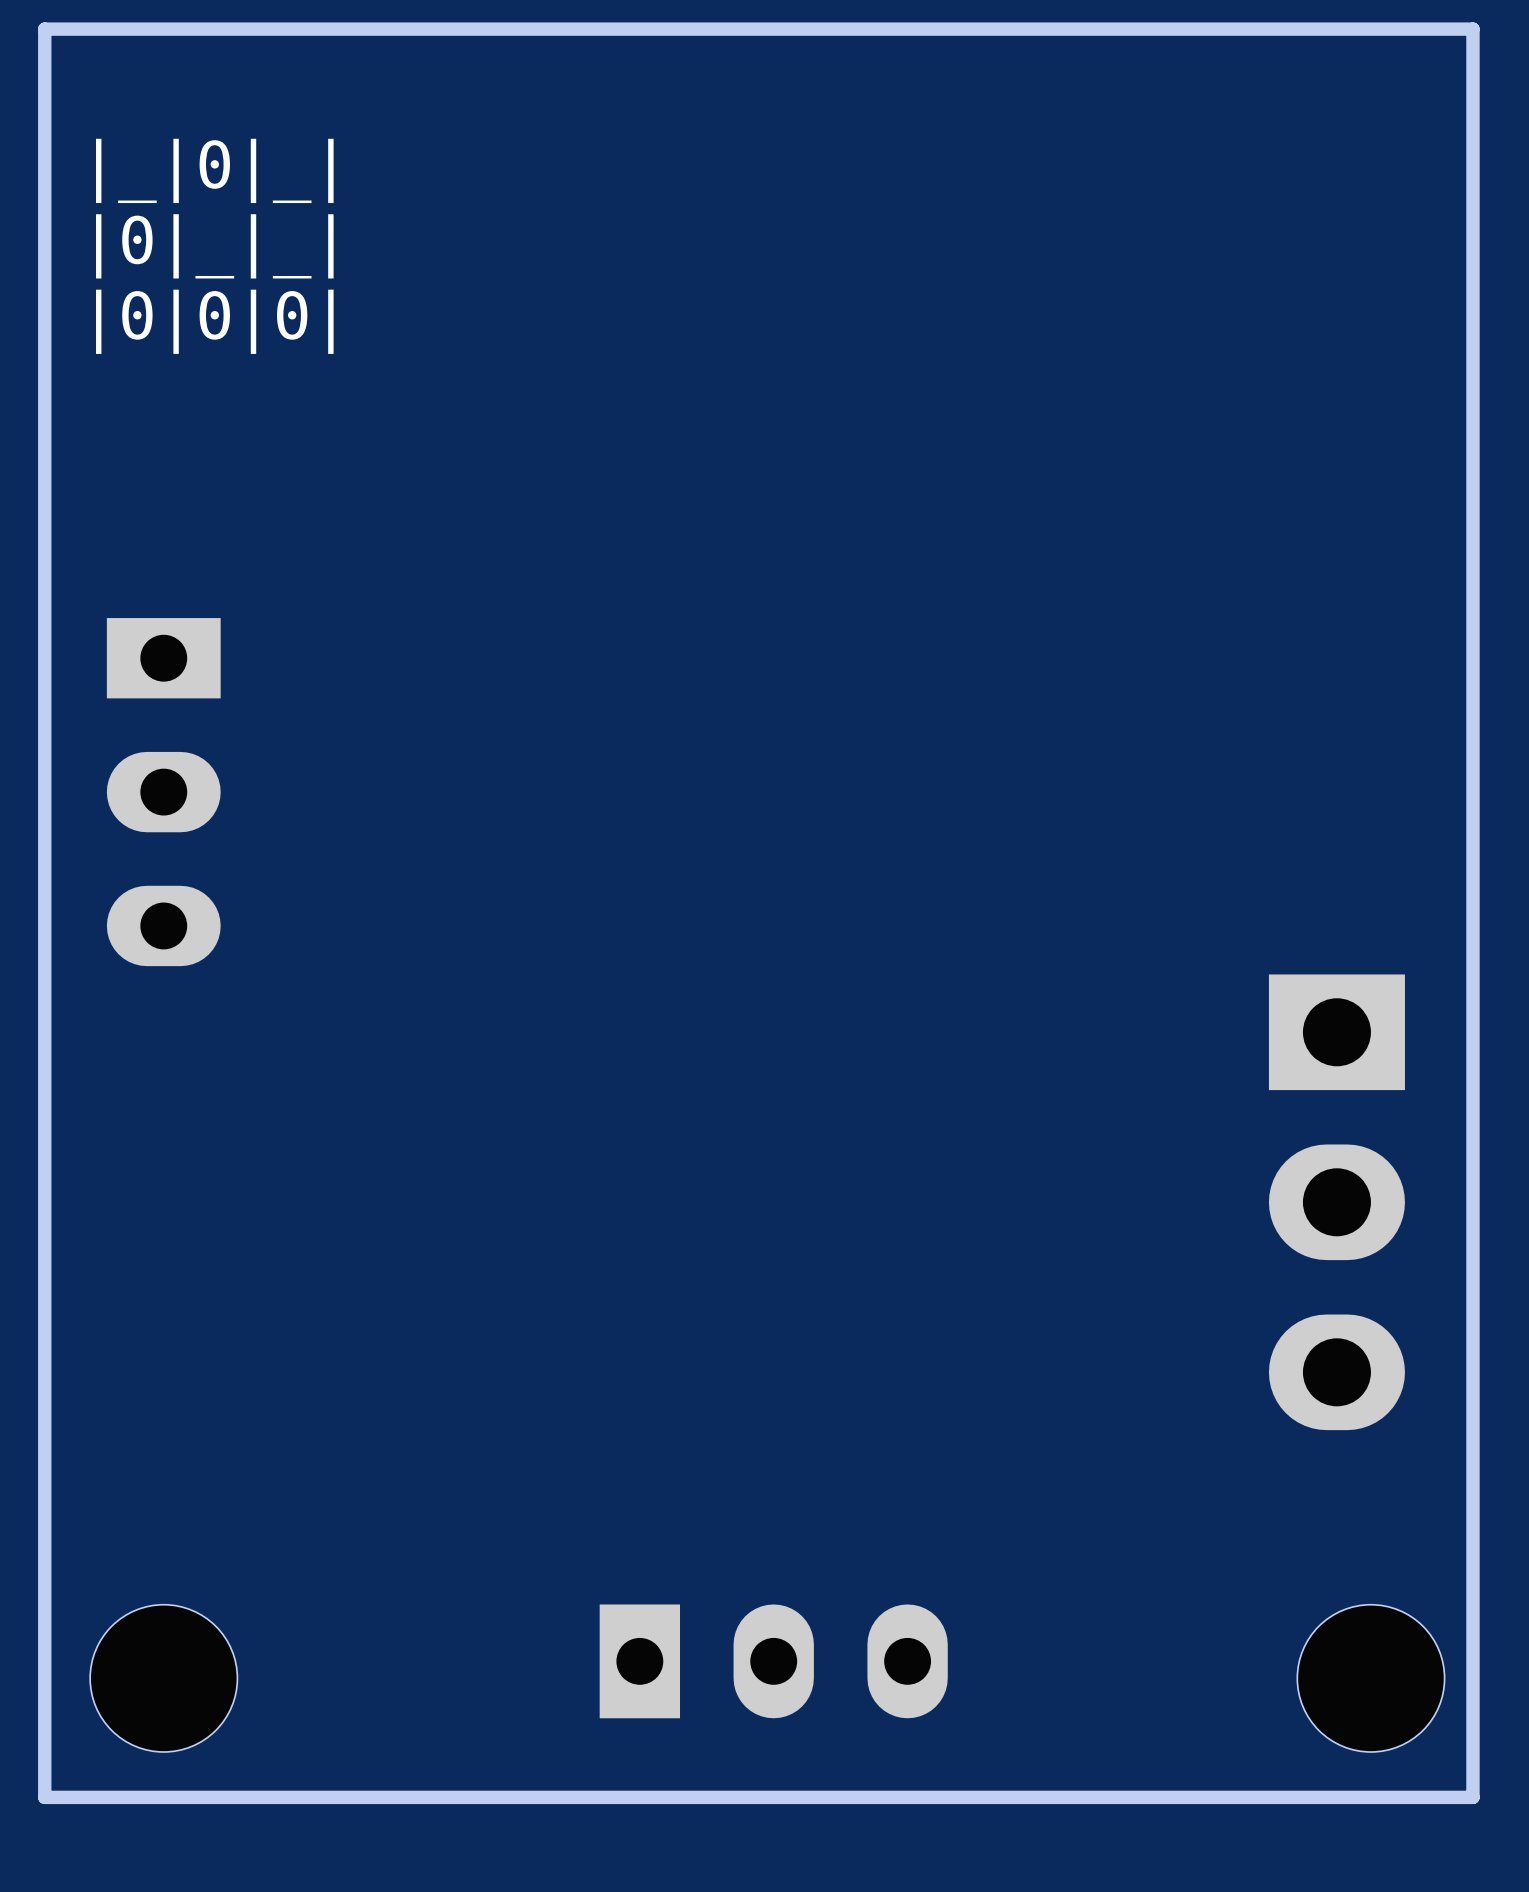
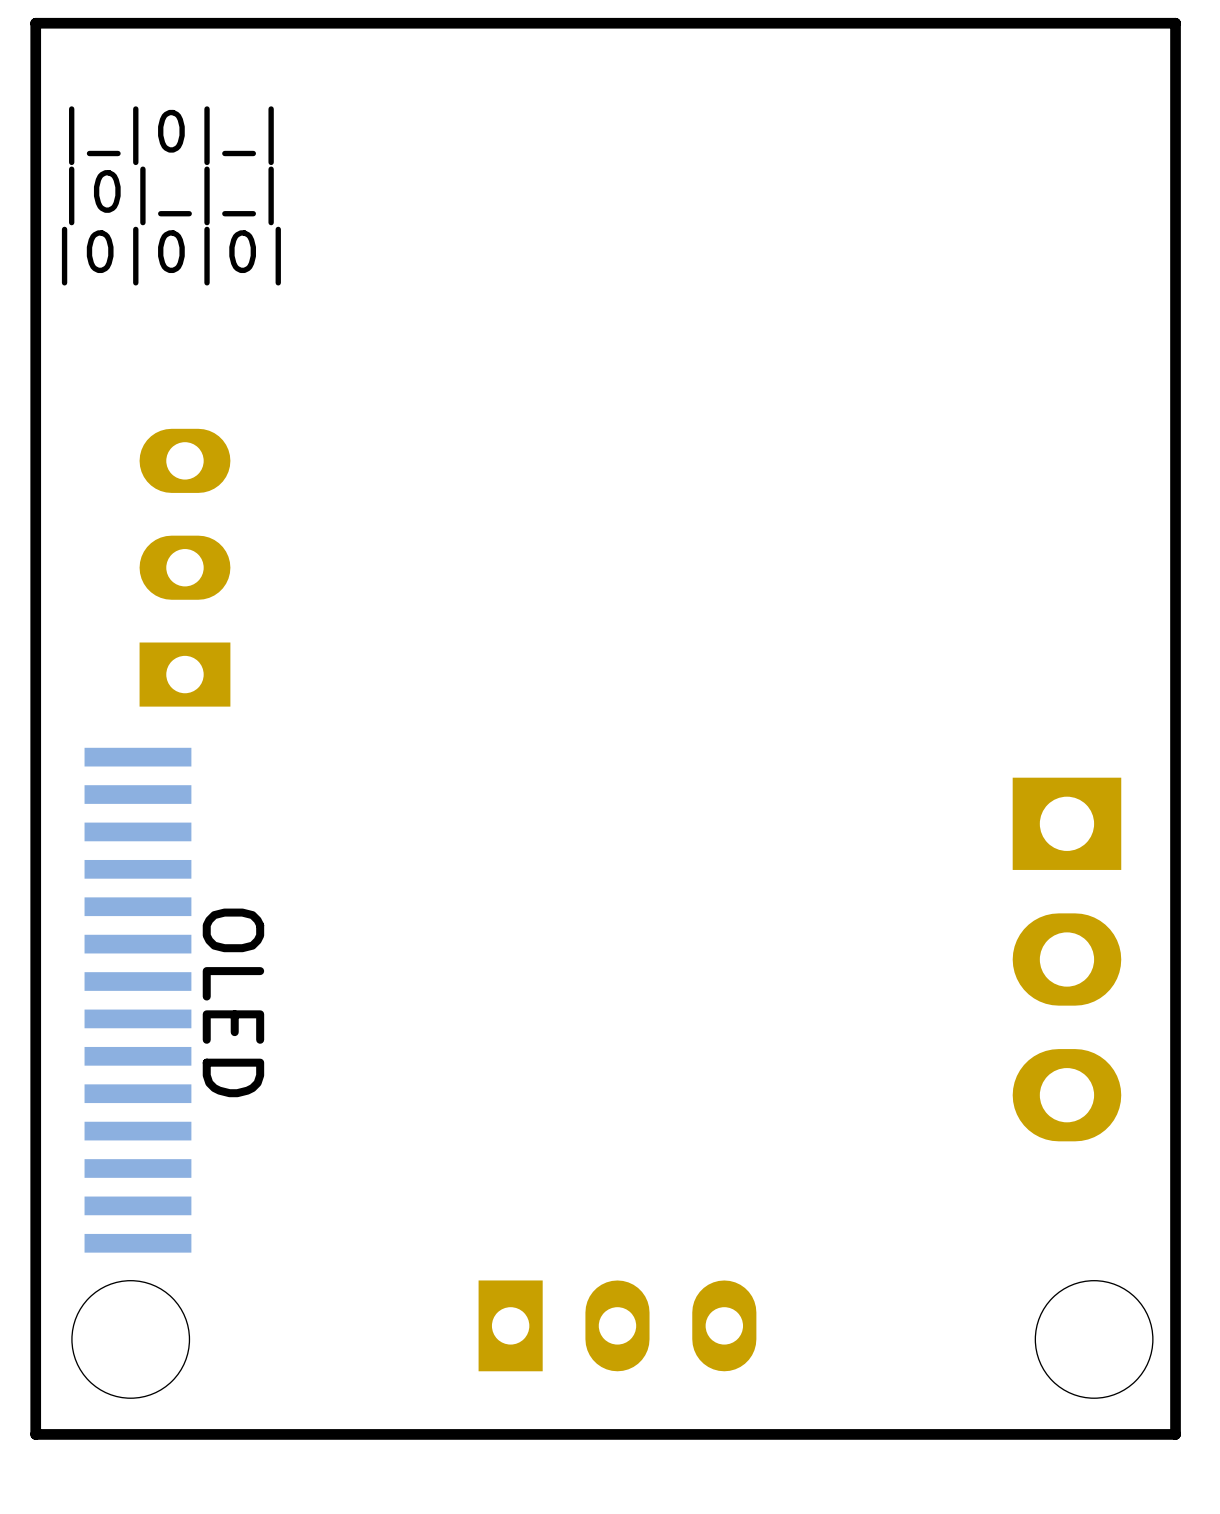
part rotation: 0° (163, 792) -> 180° (184, 567)
OLED: none -> (137, 1000)

